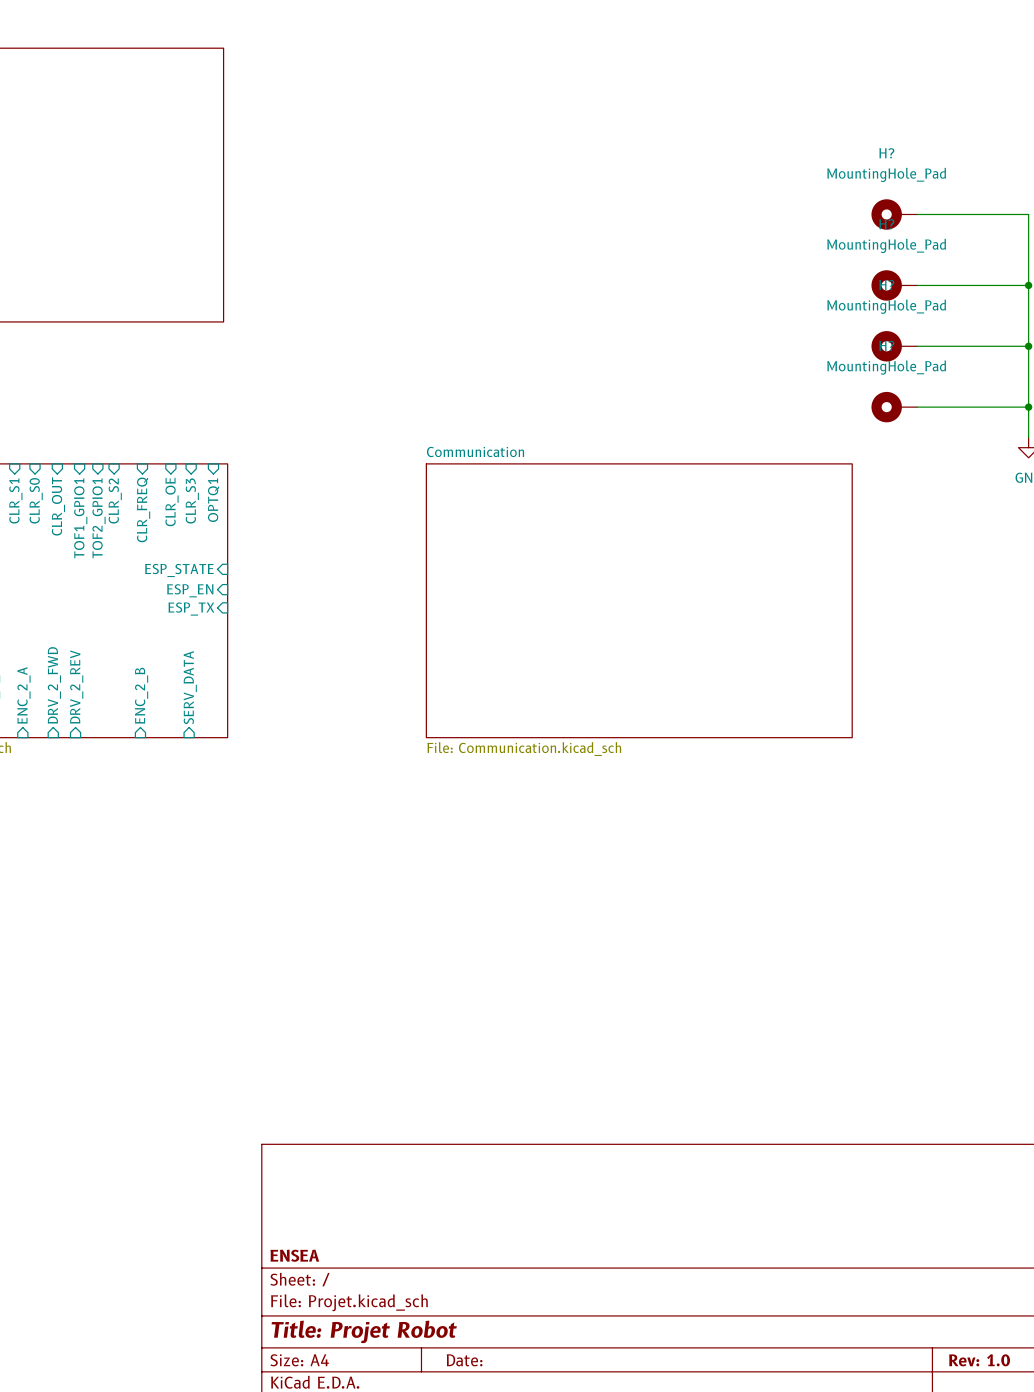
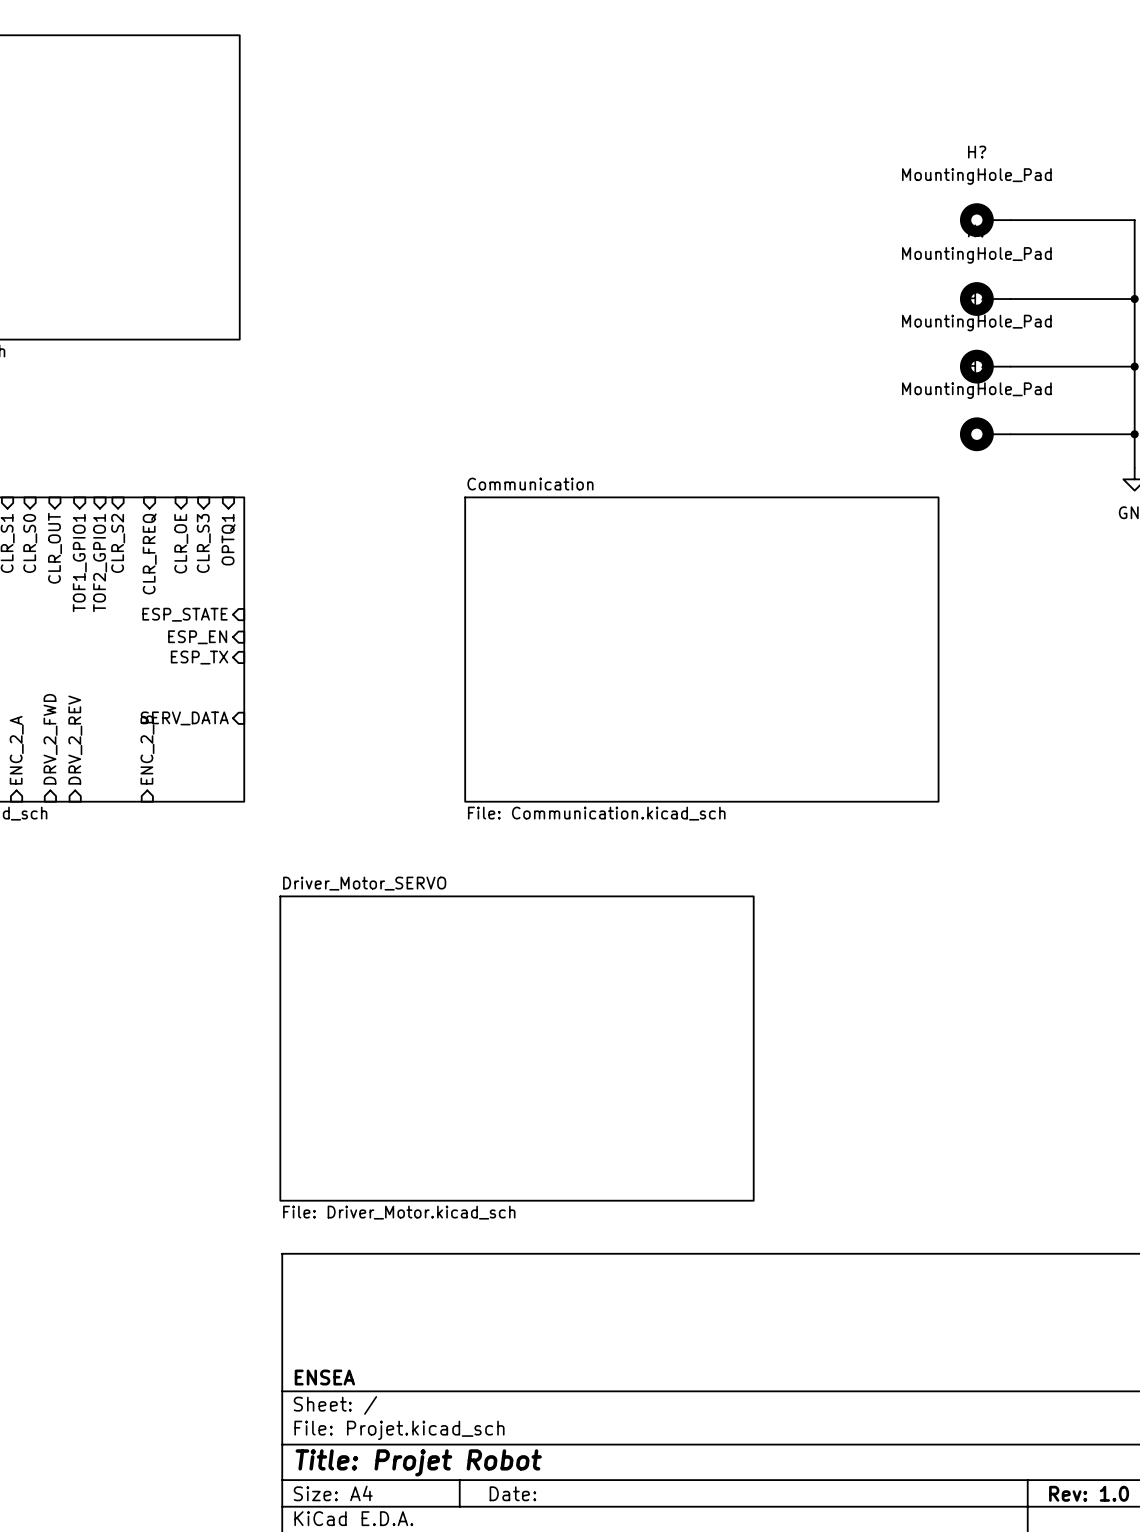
sheet pin rotation: 0° (190, 687) -> 90° counterclockwise (184, 718)
sheet Driver_Motor_SERVO: none -> File: Driver_Motor.kicad_sch (517, 1048)

